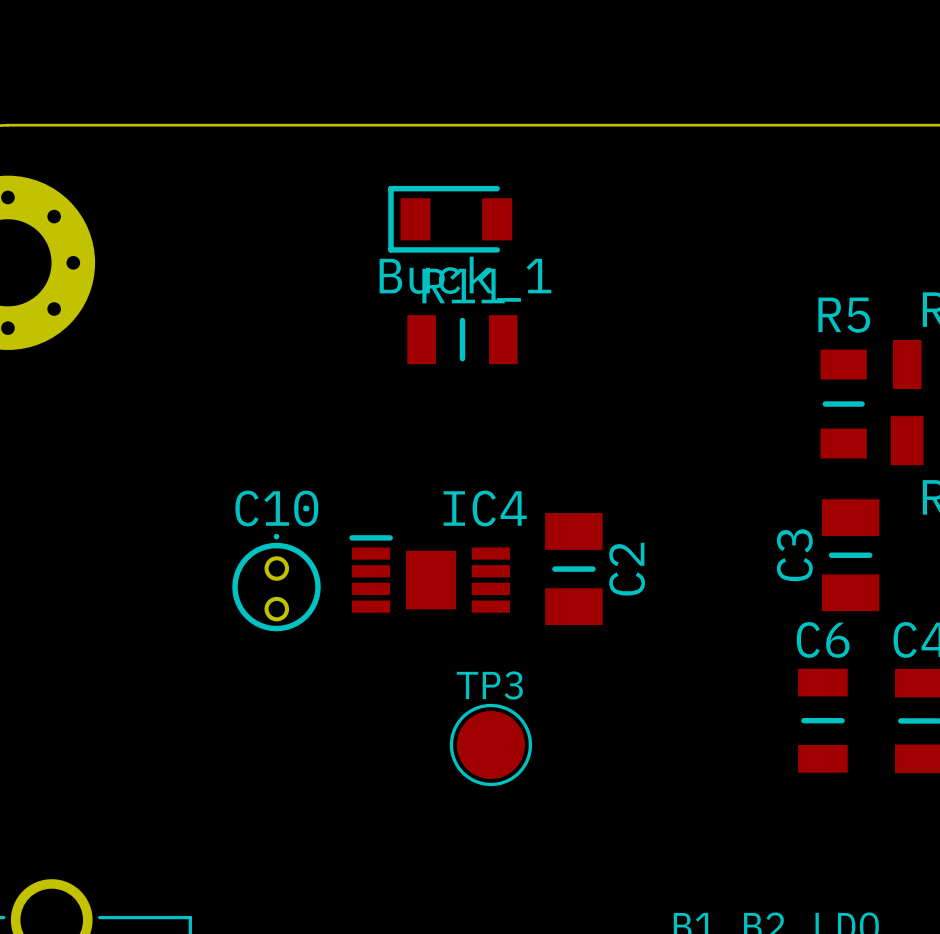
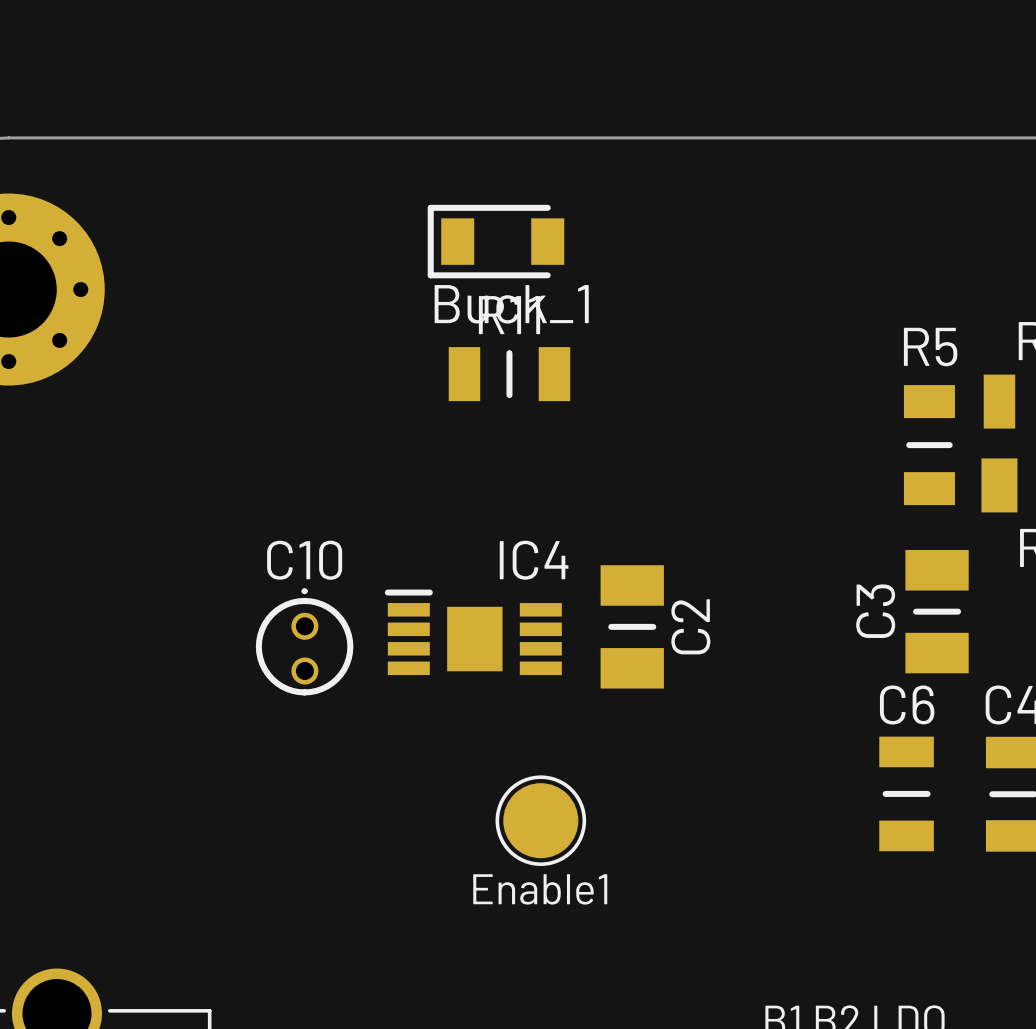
TP3 name: TP3 (489, 685) -> Enable1 (540, 889)

